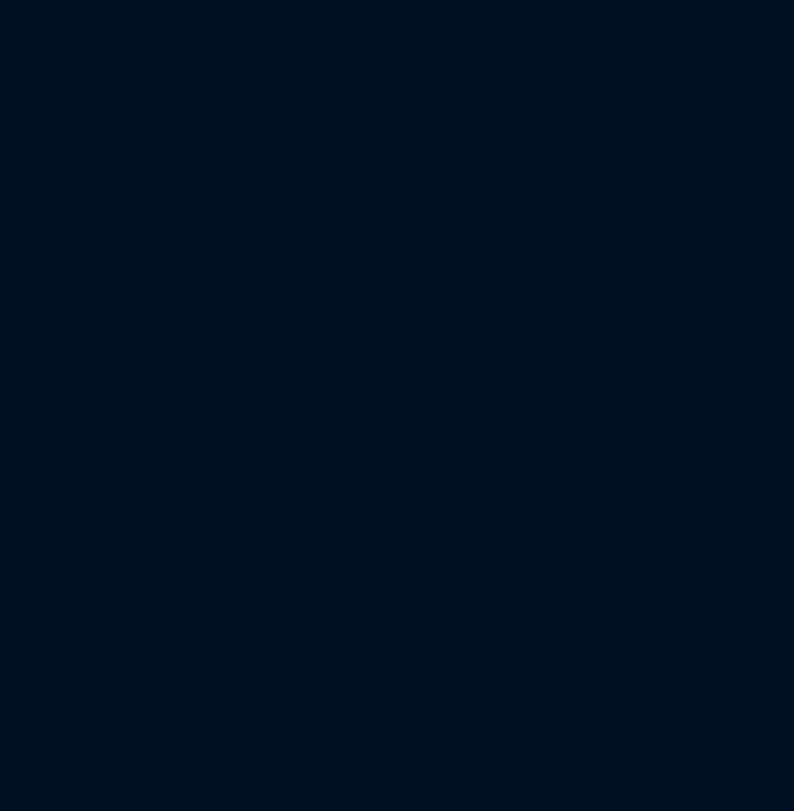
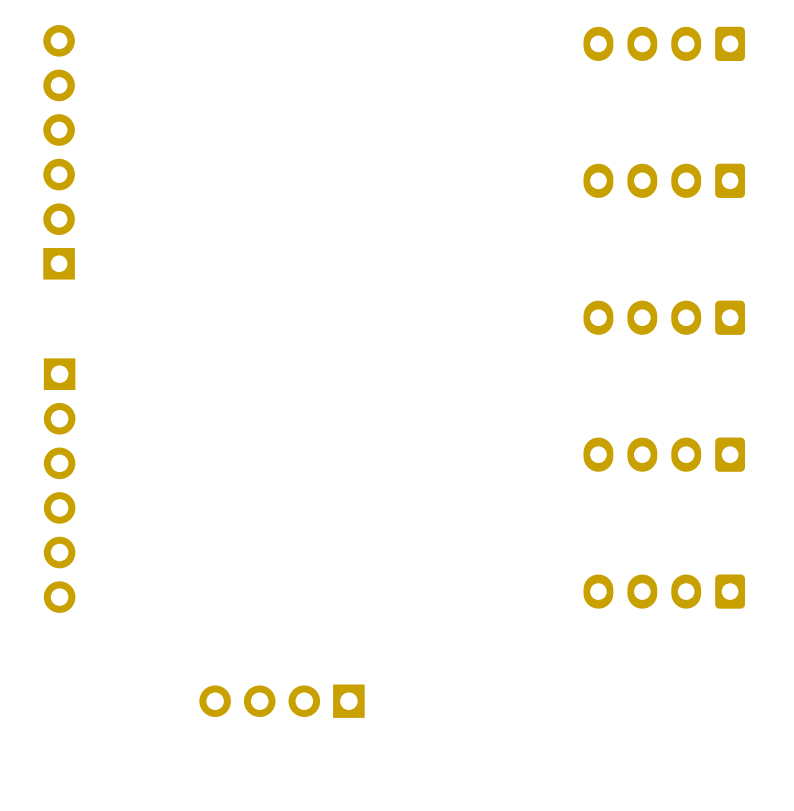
part: none -> (664, 43)
part: none -> (59, 152)
part: none -> (664, 180)
part: none -> (664, 317)
part: none -> (664, 454)
part: none -> (59, 485)
part: none -> (664, 591)
part: none -> (282, 701)

